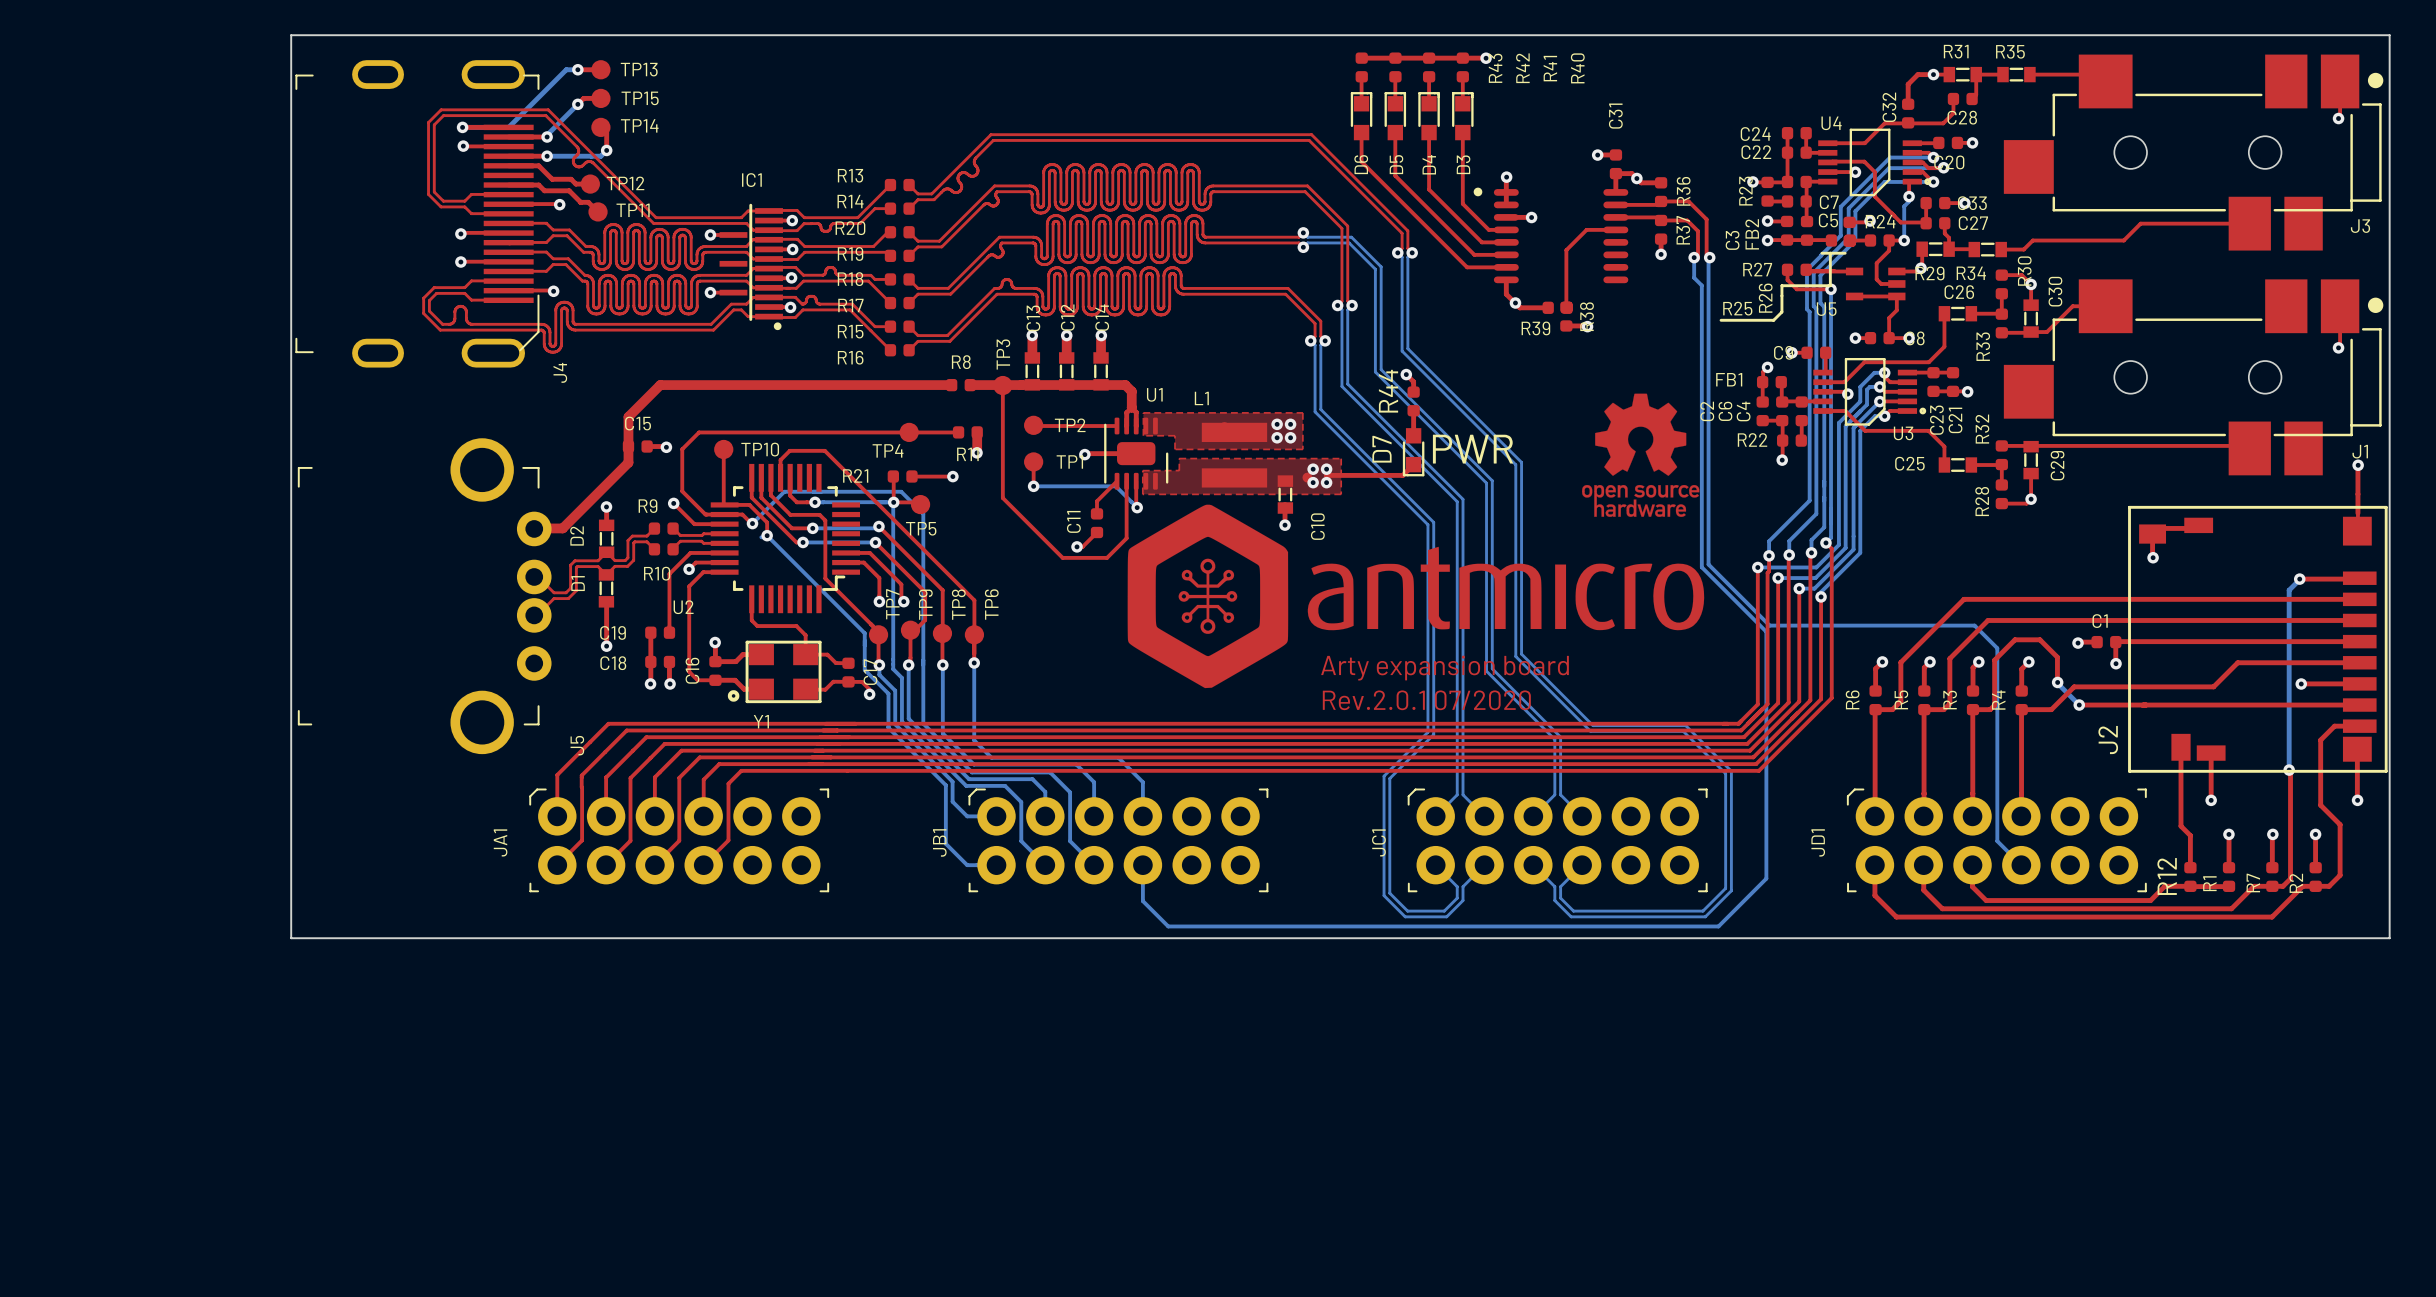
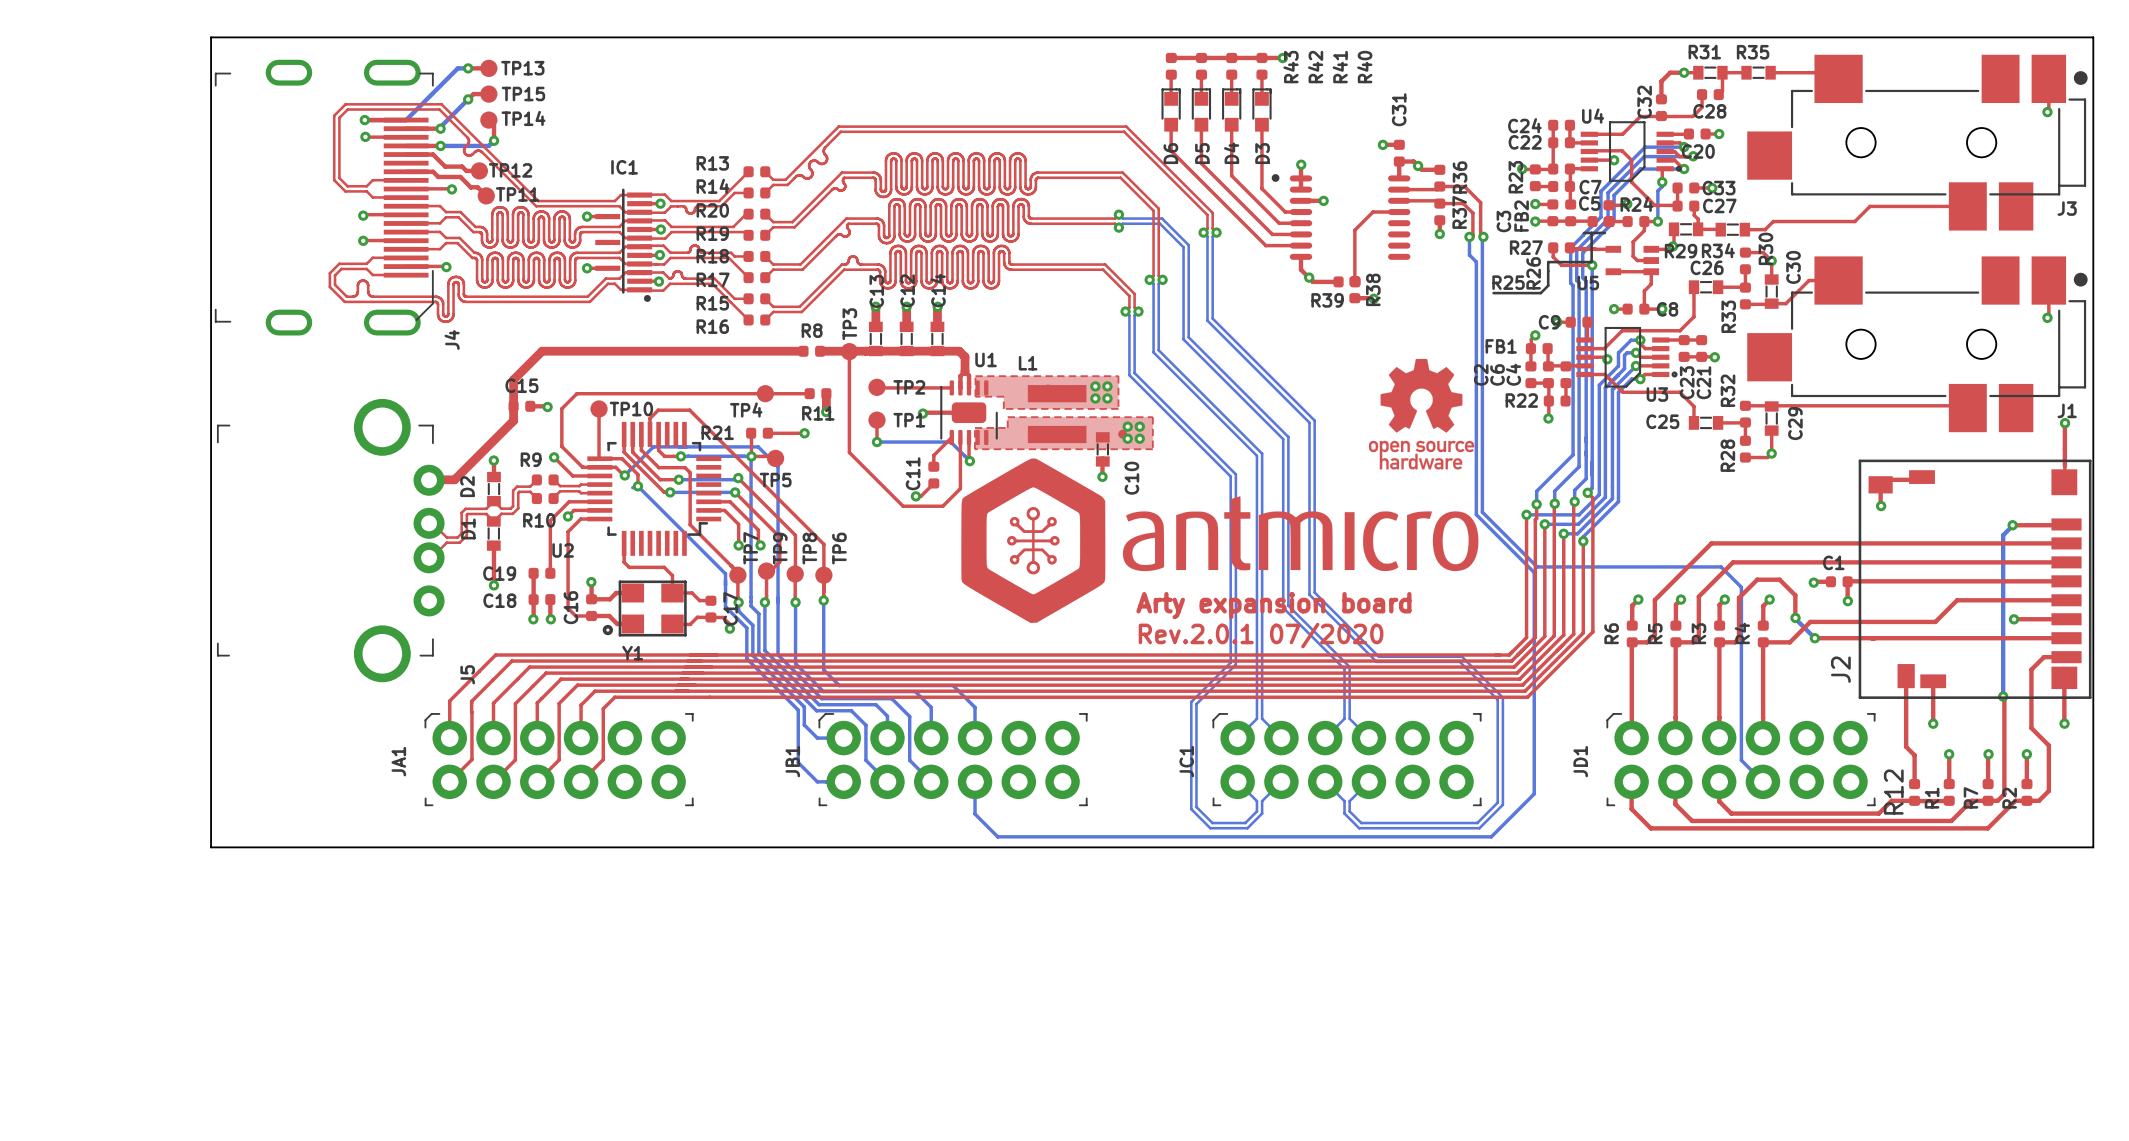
top track: (1406, 374) (1413, 381) (1413, 392) -> none
via: (1406, 374) -> none
R44: (1413, 401) -> none
top track: (1413, 410) (1413, 435) -> none
text: PWR (1472, 449) -> none
D7: (1413, 452) -> none
top track: (1413, 464) (1402, 475) (1326, 475) -> none

